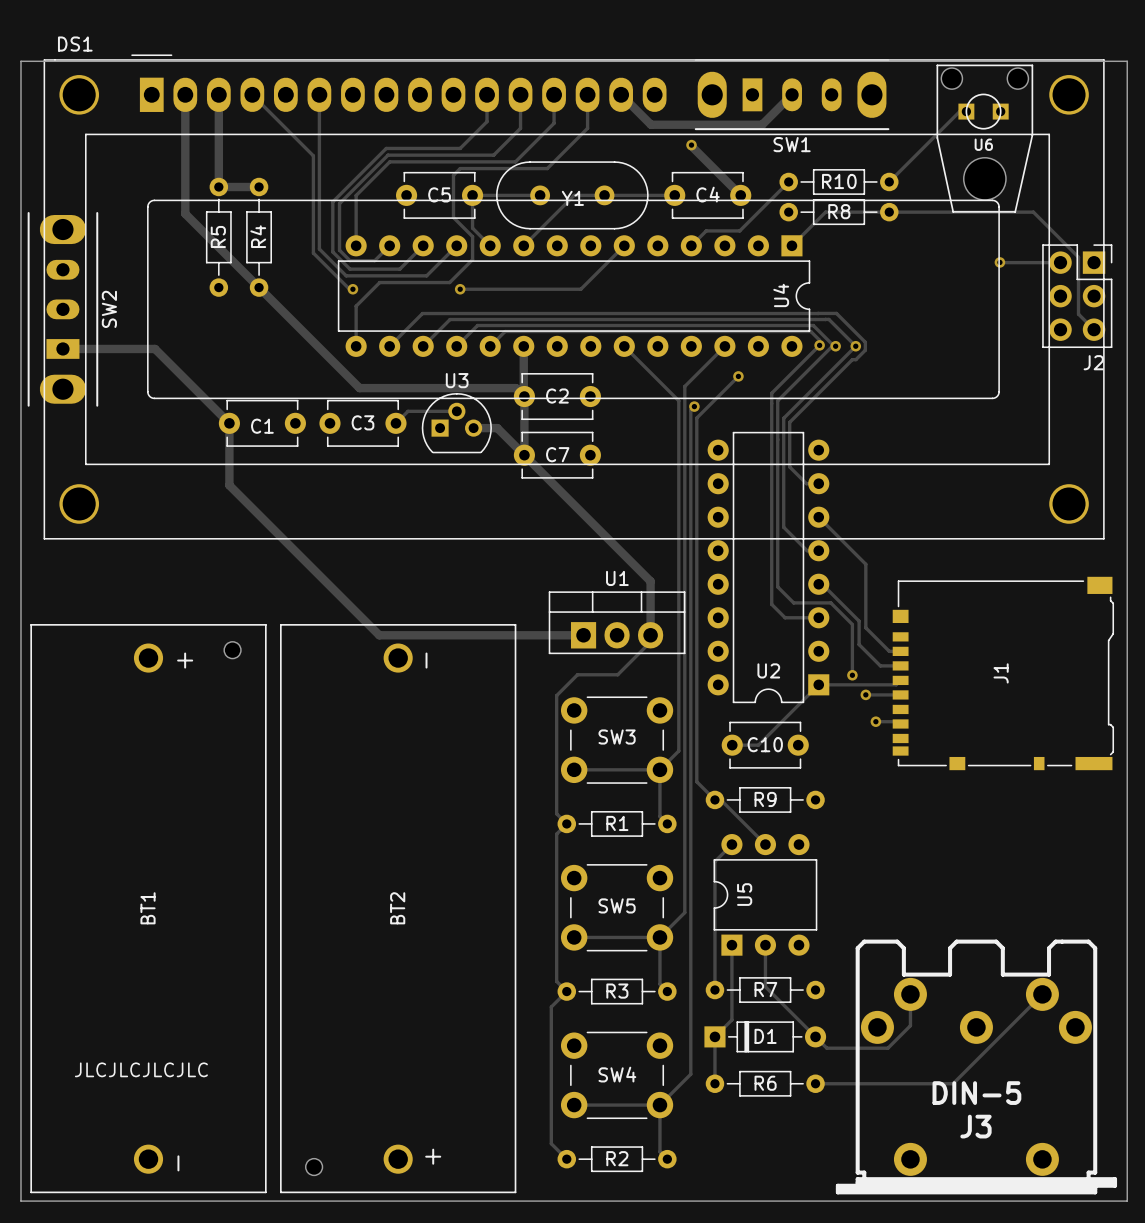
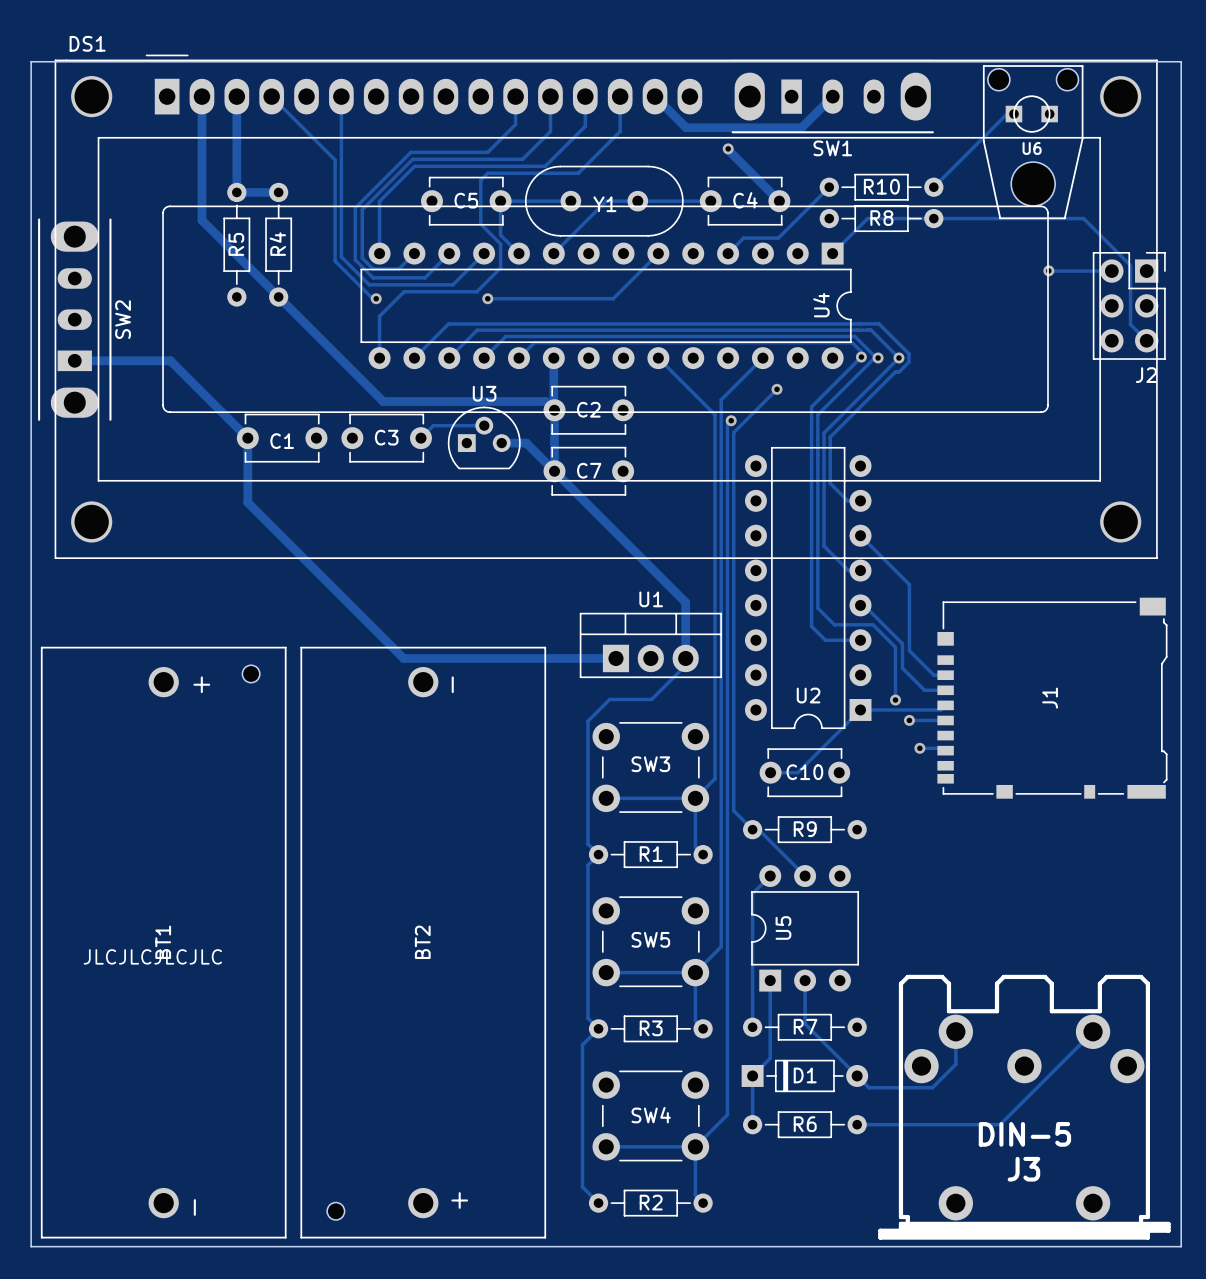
text position: JLCJLCJLCJLC (141, 1069) -> JLCJLCJLCJLC (152, 956)

